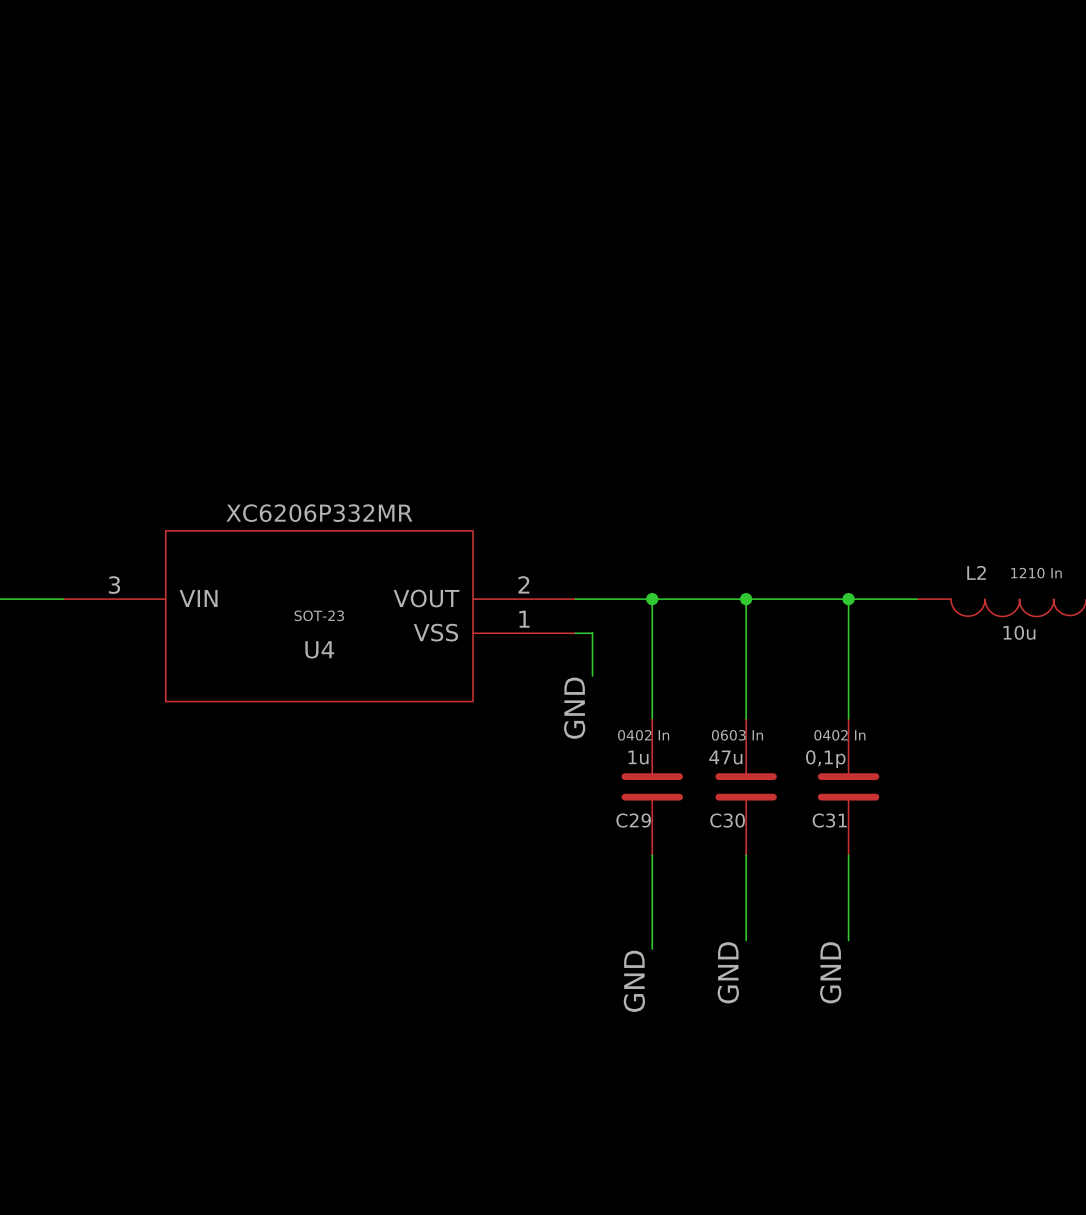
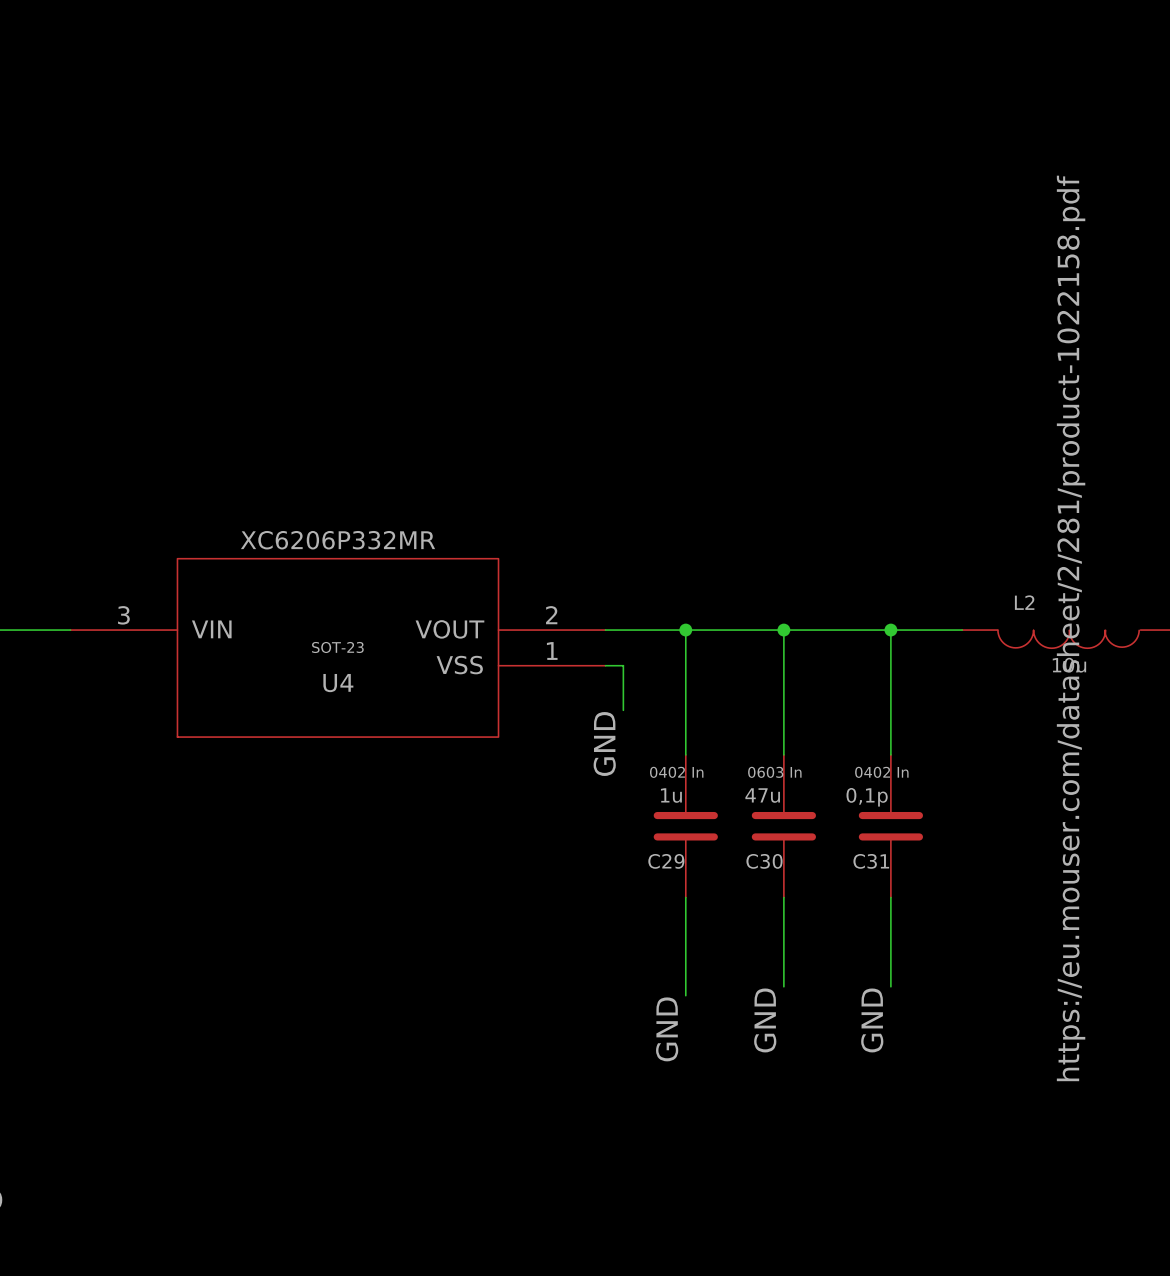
L2 text: 1210 In (1036, 573) -> none
L2 text: none -> https://eu.mouser.com/datasheet/2/281/product-1022158.pdf (1071, 628)

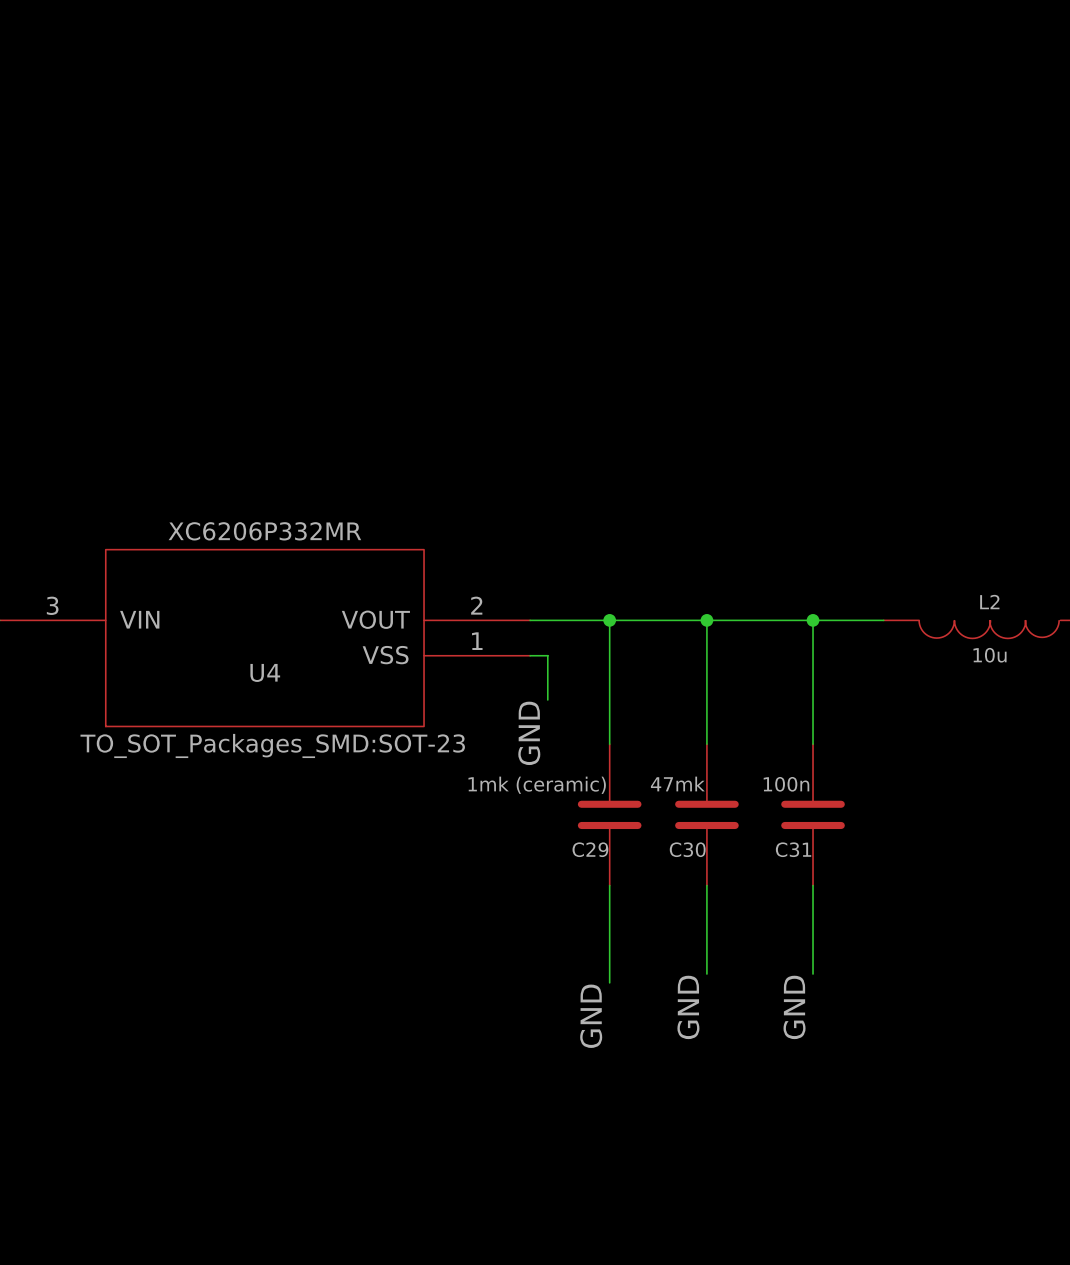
L2 name position: L2 (1024, 602) -> L2 (989, 602)
L2 text: https://eu.mouser.com/datasheet/2/281/product-1022158.pdf (1071, 628) -> none
U4 text: SOT-23 (337, 647) -> none
U4 text: none -> TO_SOT_Packages_SMD:SOT-23 (272, 745)
C29 text: 0402 In (676, 772) -> none
C30 text: 0603 In (774, 772) -> none
C31 text: 0402 In (881, 772) -> none
C29 value: 1u (671, 795) -> 1mk (ceramic) (537, 785)
C30 value: 47u (762, 795) -> 47mk (677, 783)
C31 value: 0,1p (867, 797) -> 100n (786, 784)

